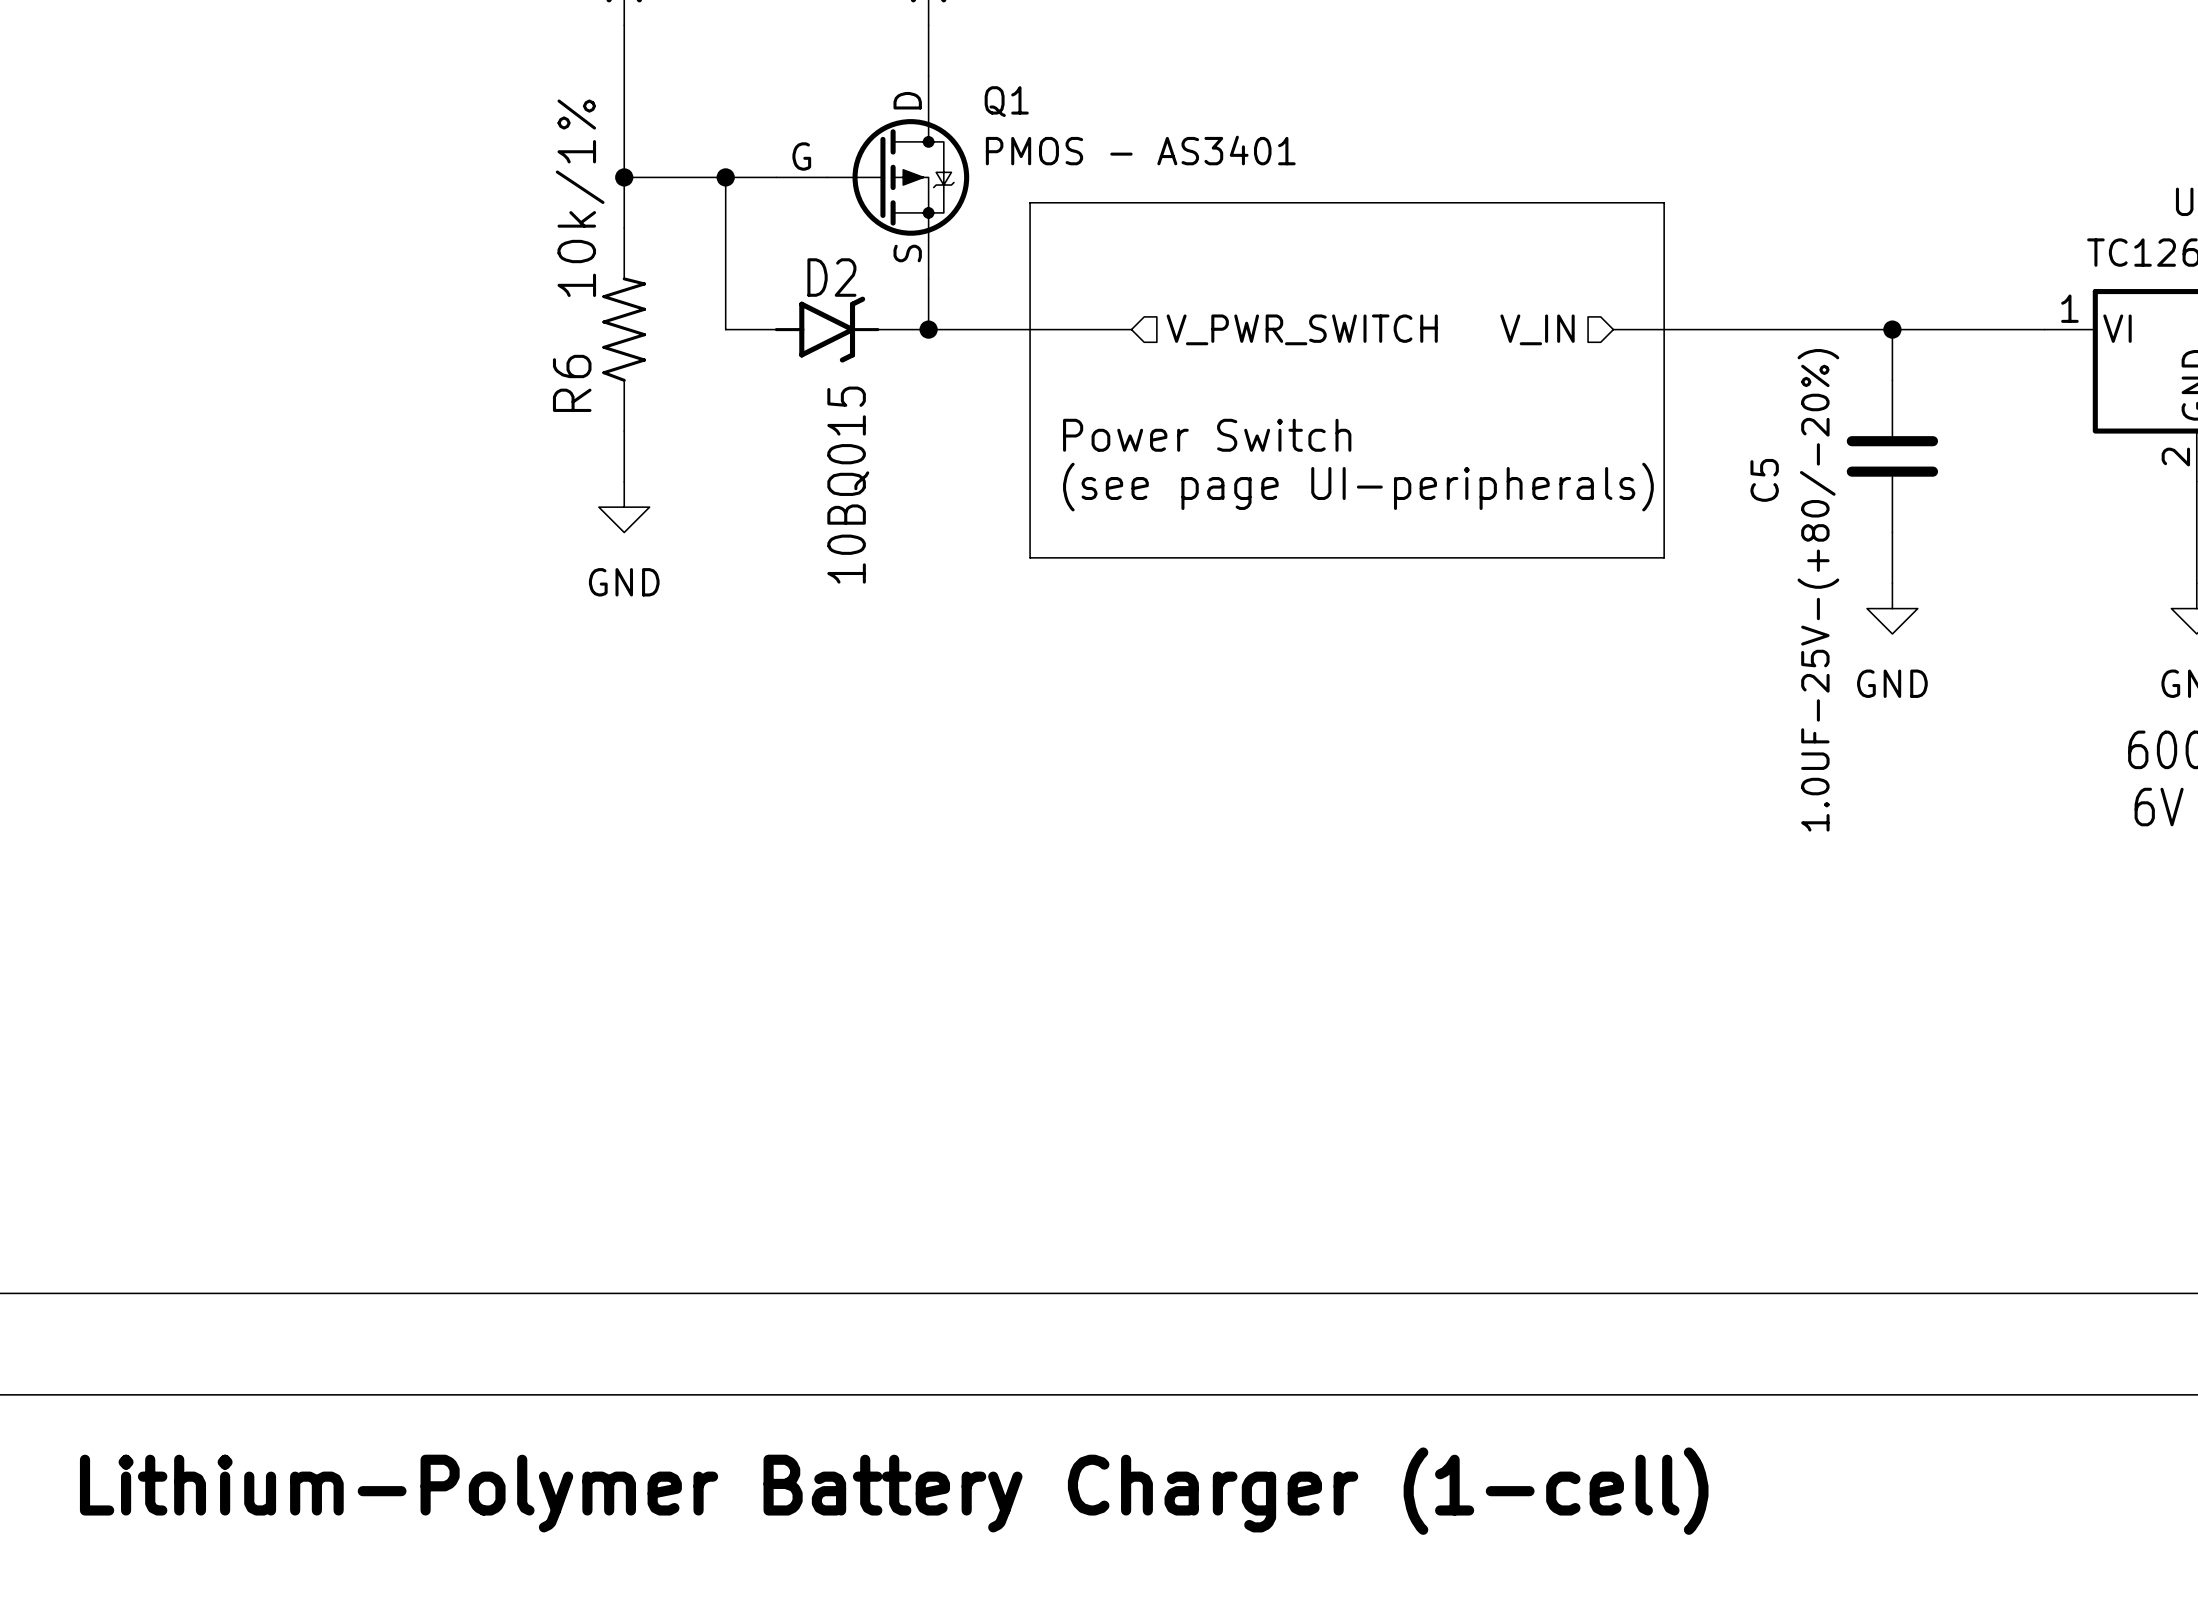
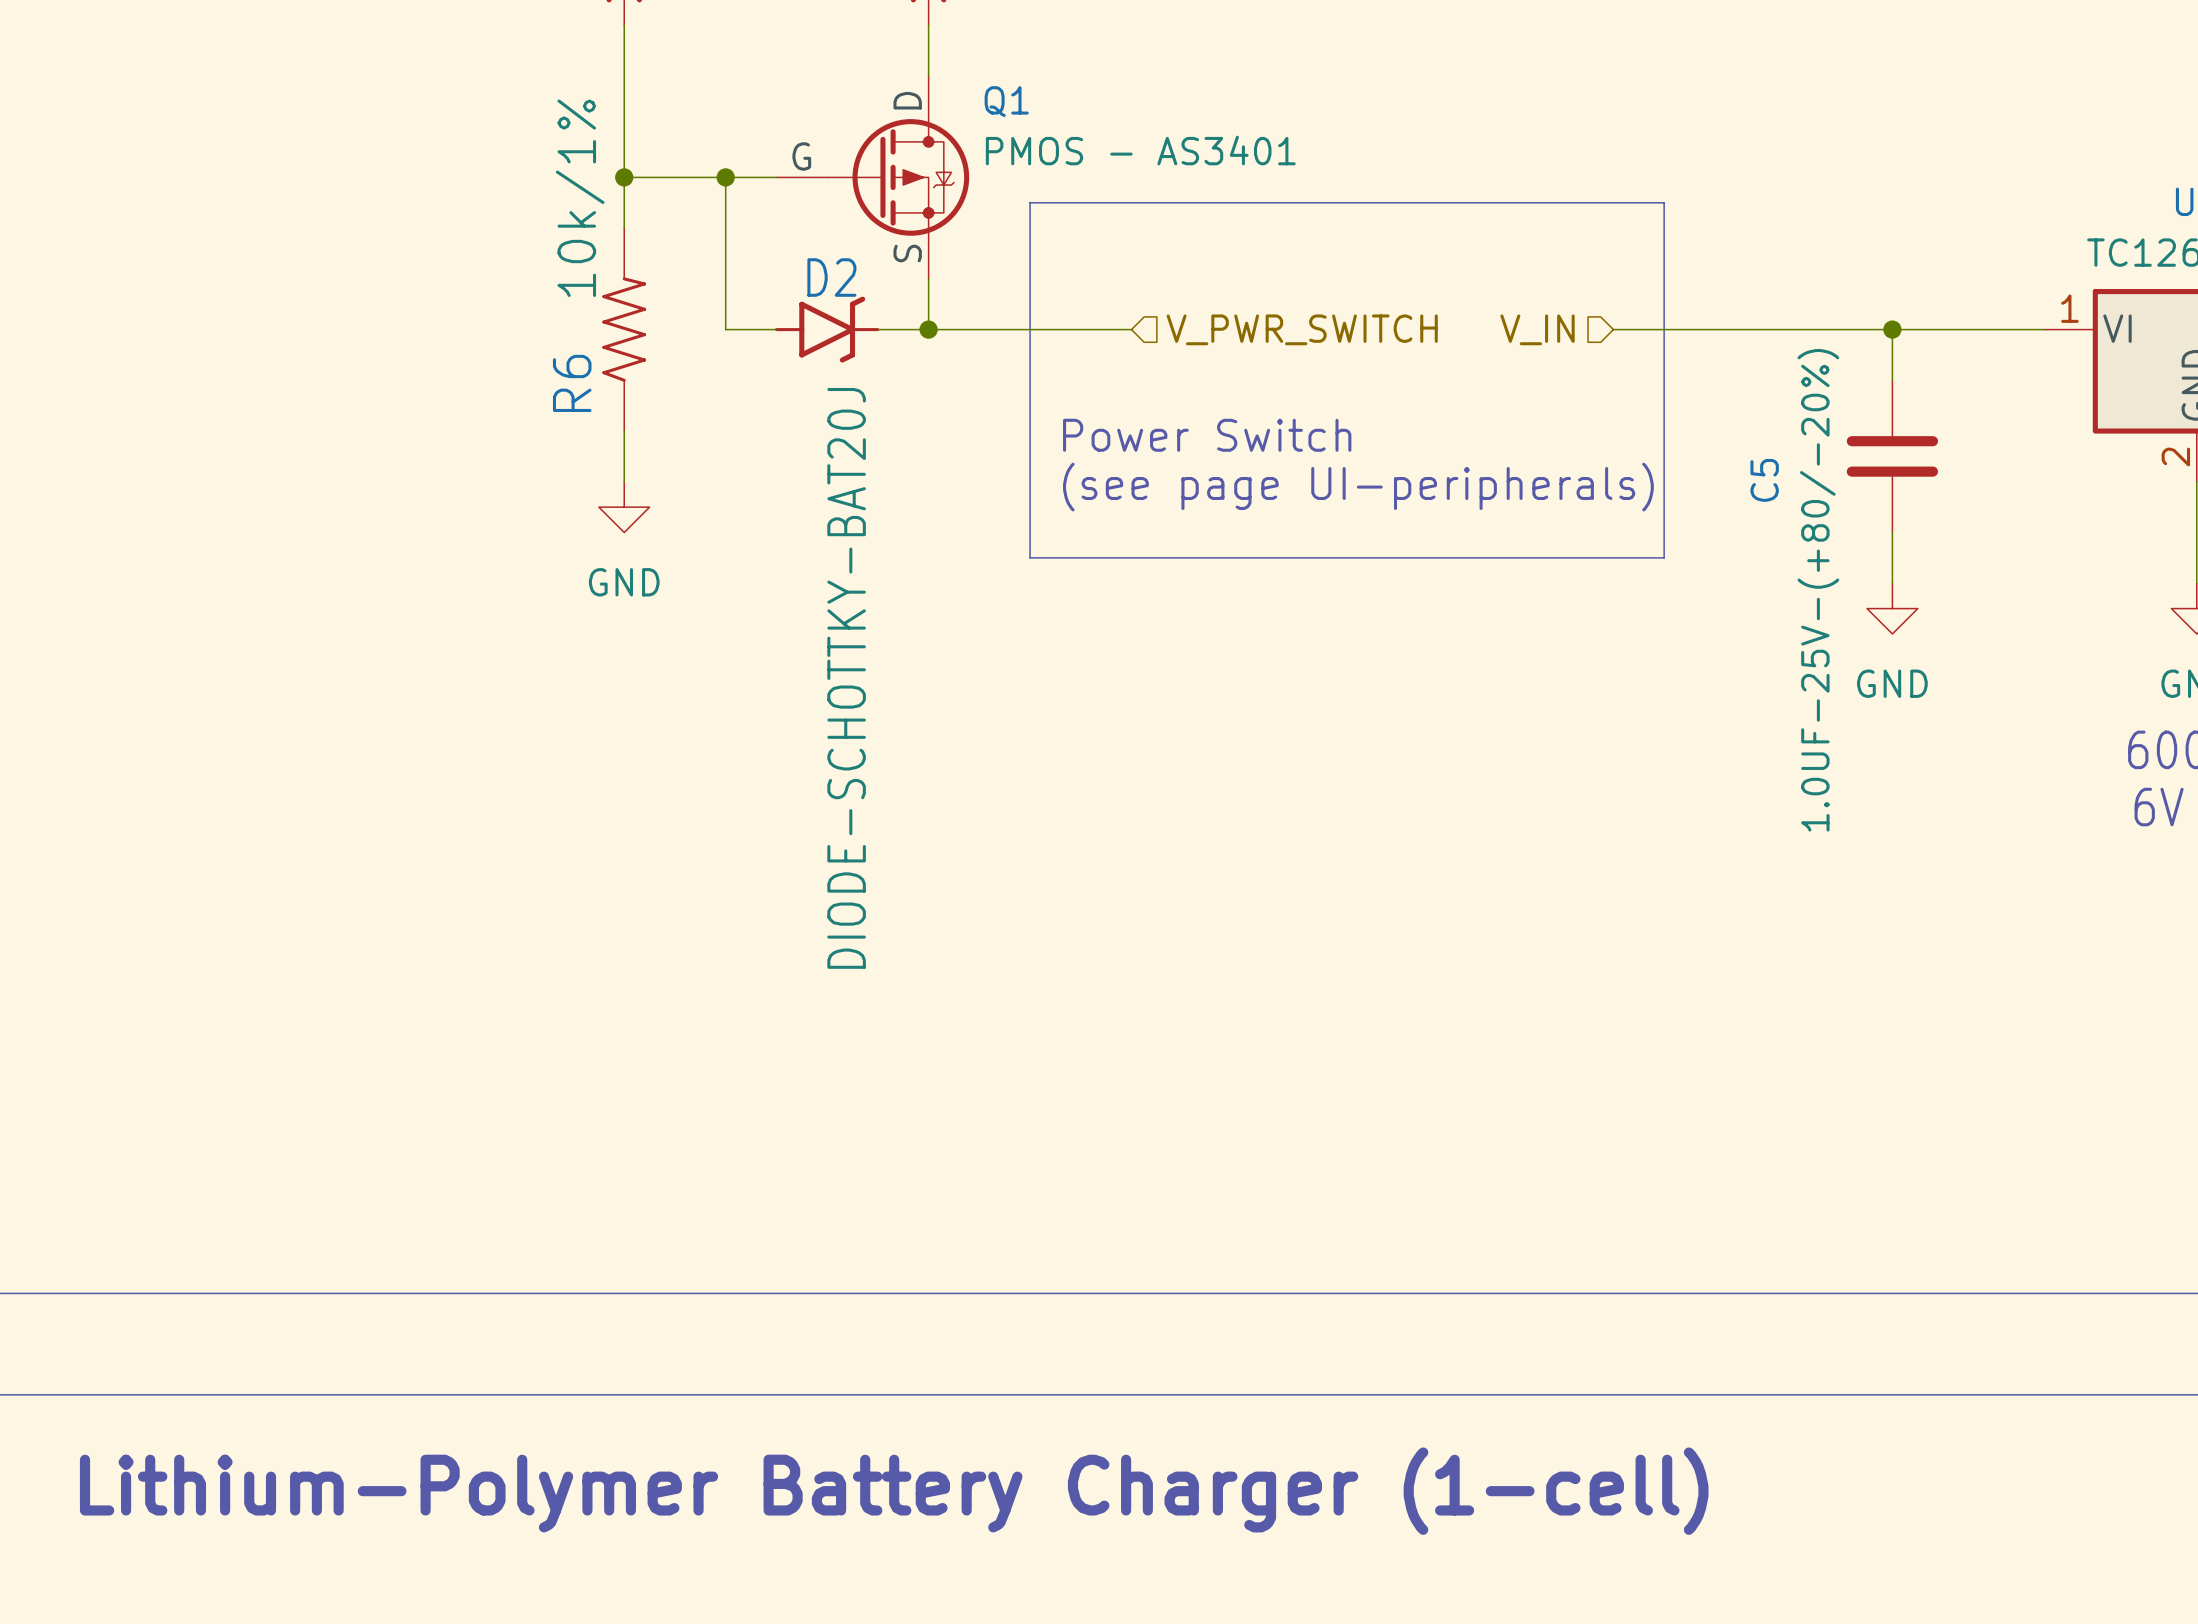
D2 value: 10BQ015 (848, 485) -> DIODE-SCHOTTKY-BAT20J (846, 678)

